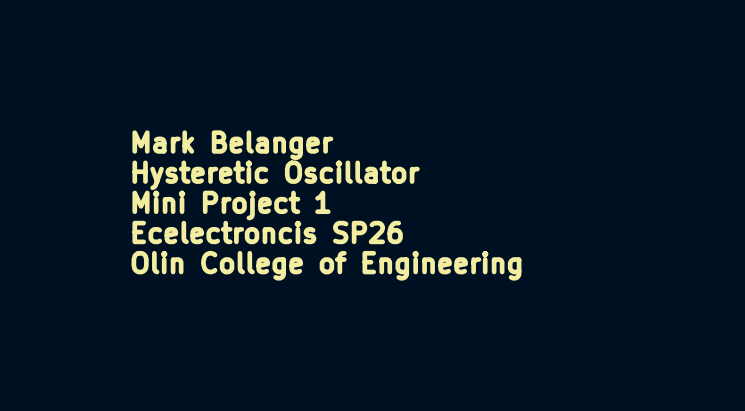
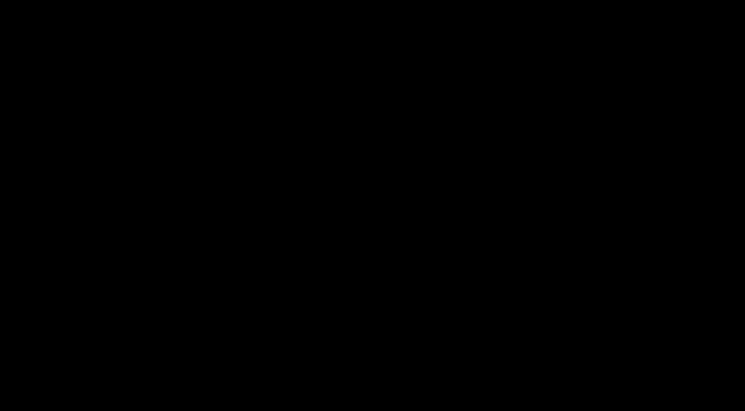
text: Mark Belanger (232, 145) -> none
text: Hysteretic Oscillator (276, 175) -> none
text: Mini Project 1 (231, 205) -> none
text: Ecelectroncis SP26 (267, 232) -> none
text: Olin College of Engineering (326, 265) -> none

